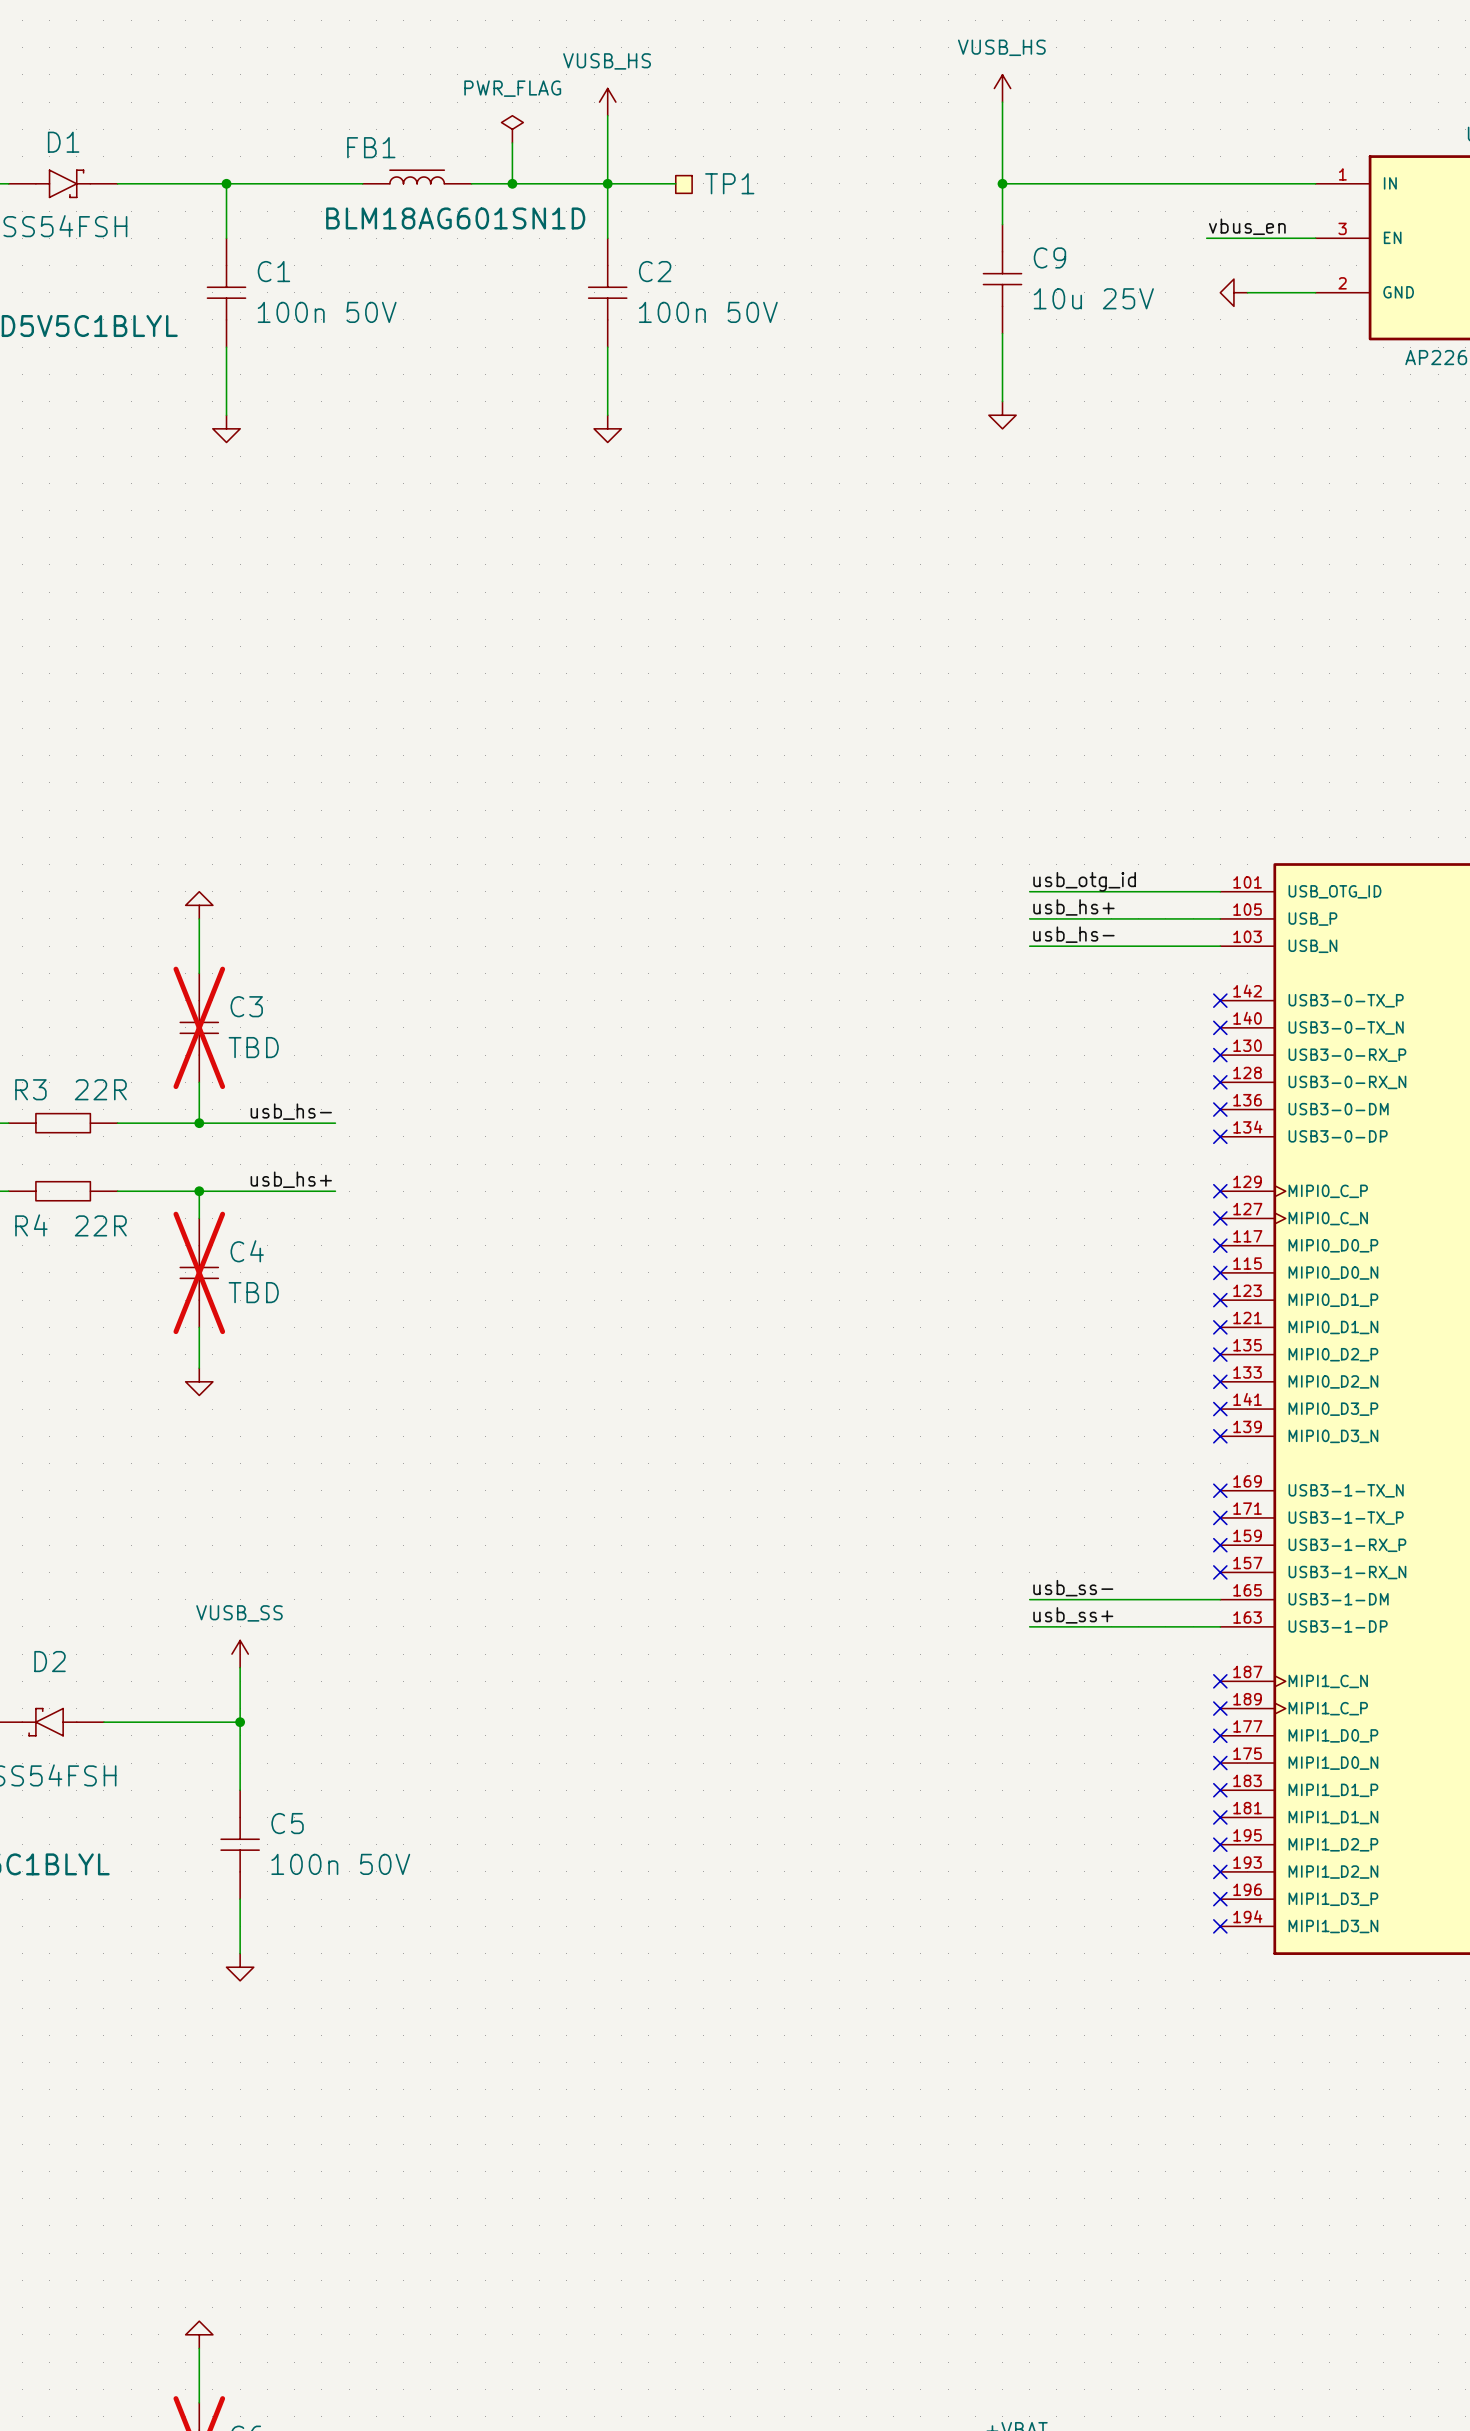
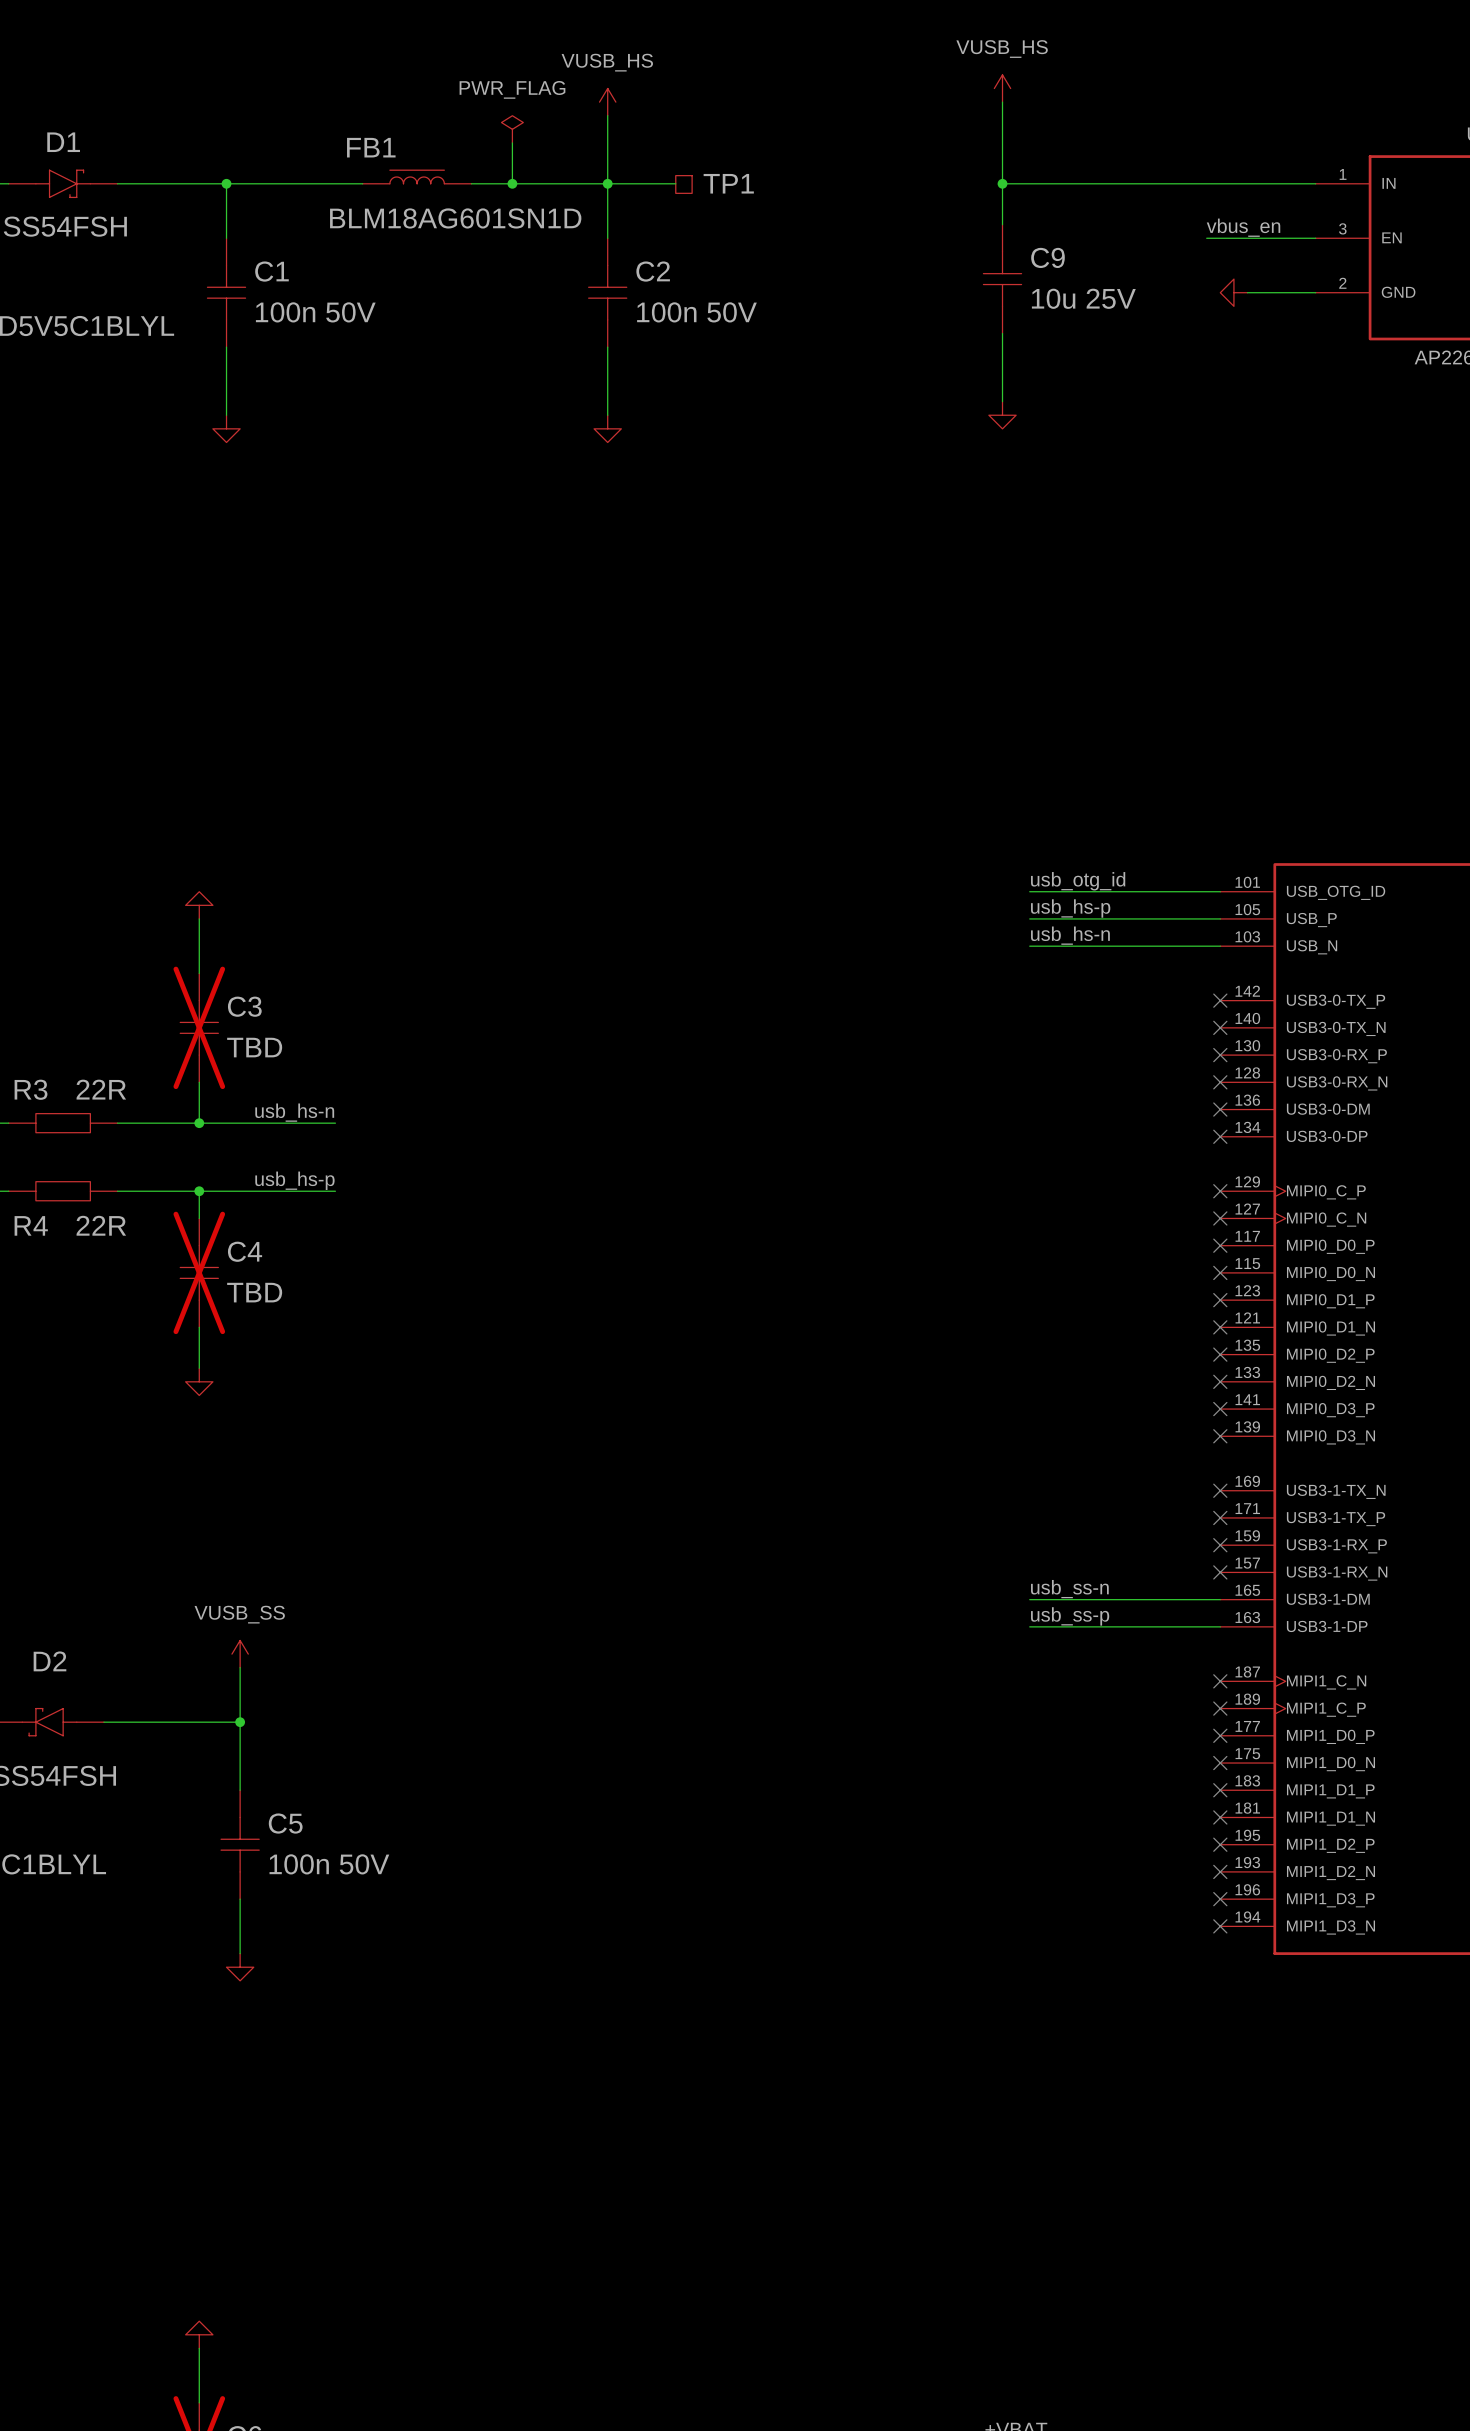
label: usb_hs+ (1073, 907) -> usb_hs-p (1070, 908)
label: usb_hs- (1073, 934) -> usb_hs-n (1070, 935)
label: usb_hs- (291, 1111) -> usb_hs-n (294, 1112)
label: usb_hs+ (291, 1179) -> usb_hs-p (294, 1180)
label: usb_ss- (1073, 1588) -> usb_ss-n (1069, 1589)
label: usb_ss+ (1073, 1615) -> usb_ss-p (1070, 1616)

